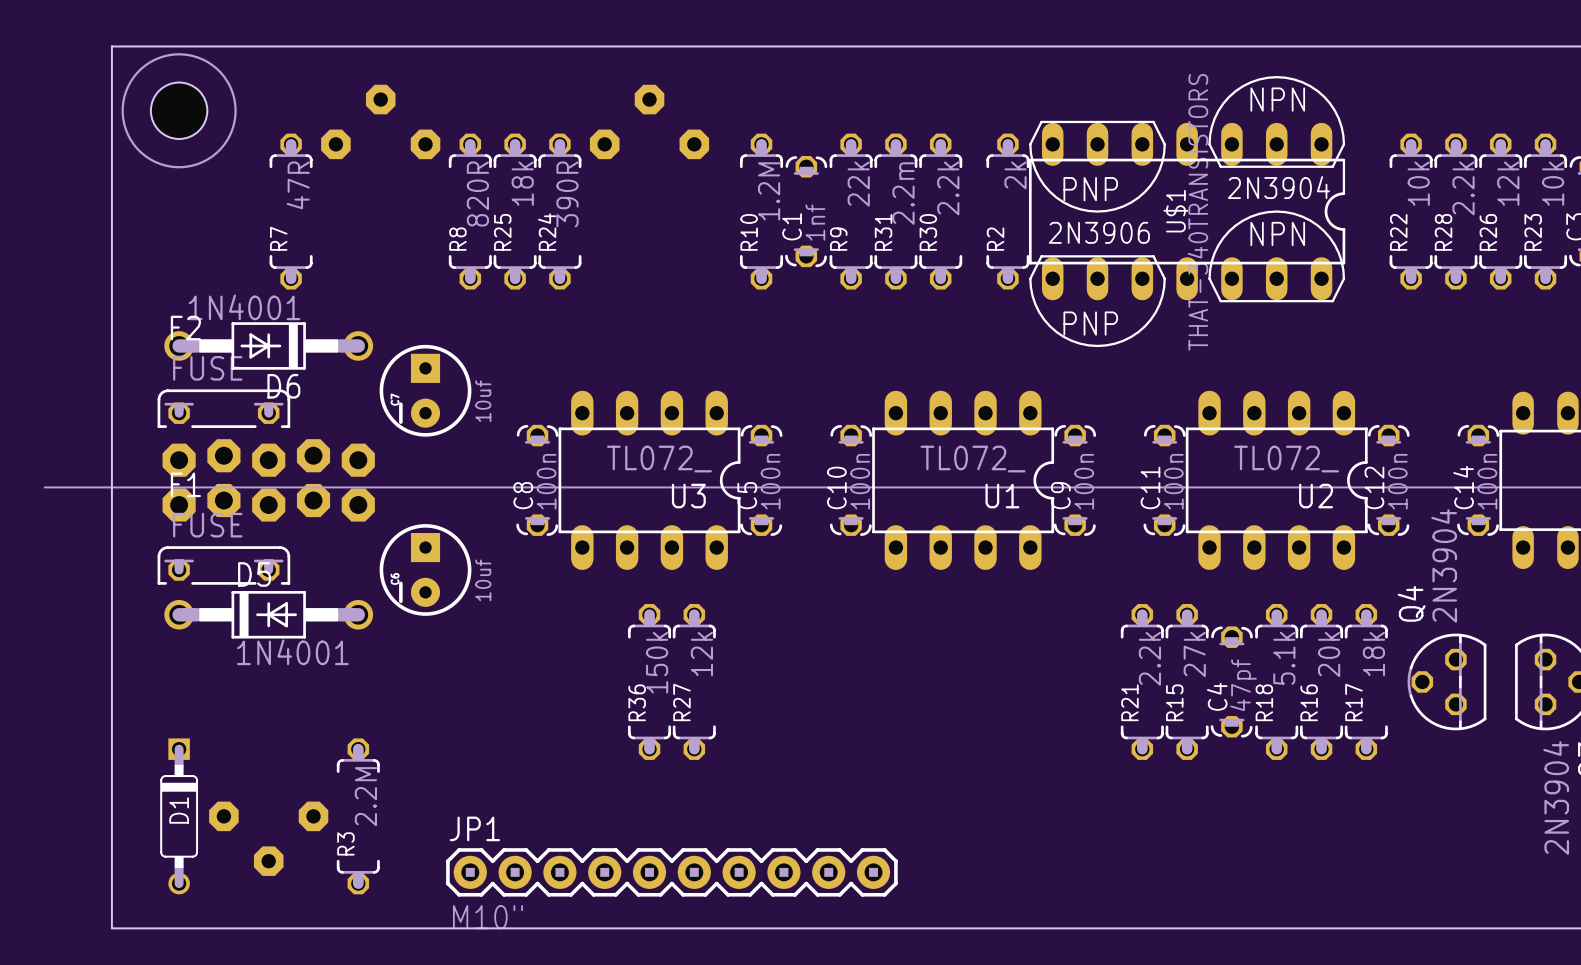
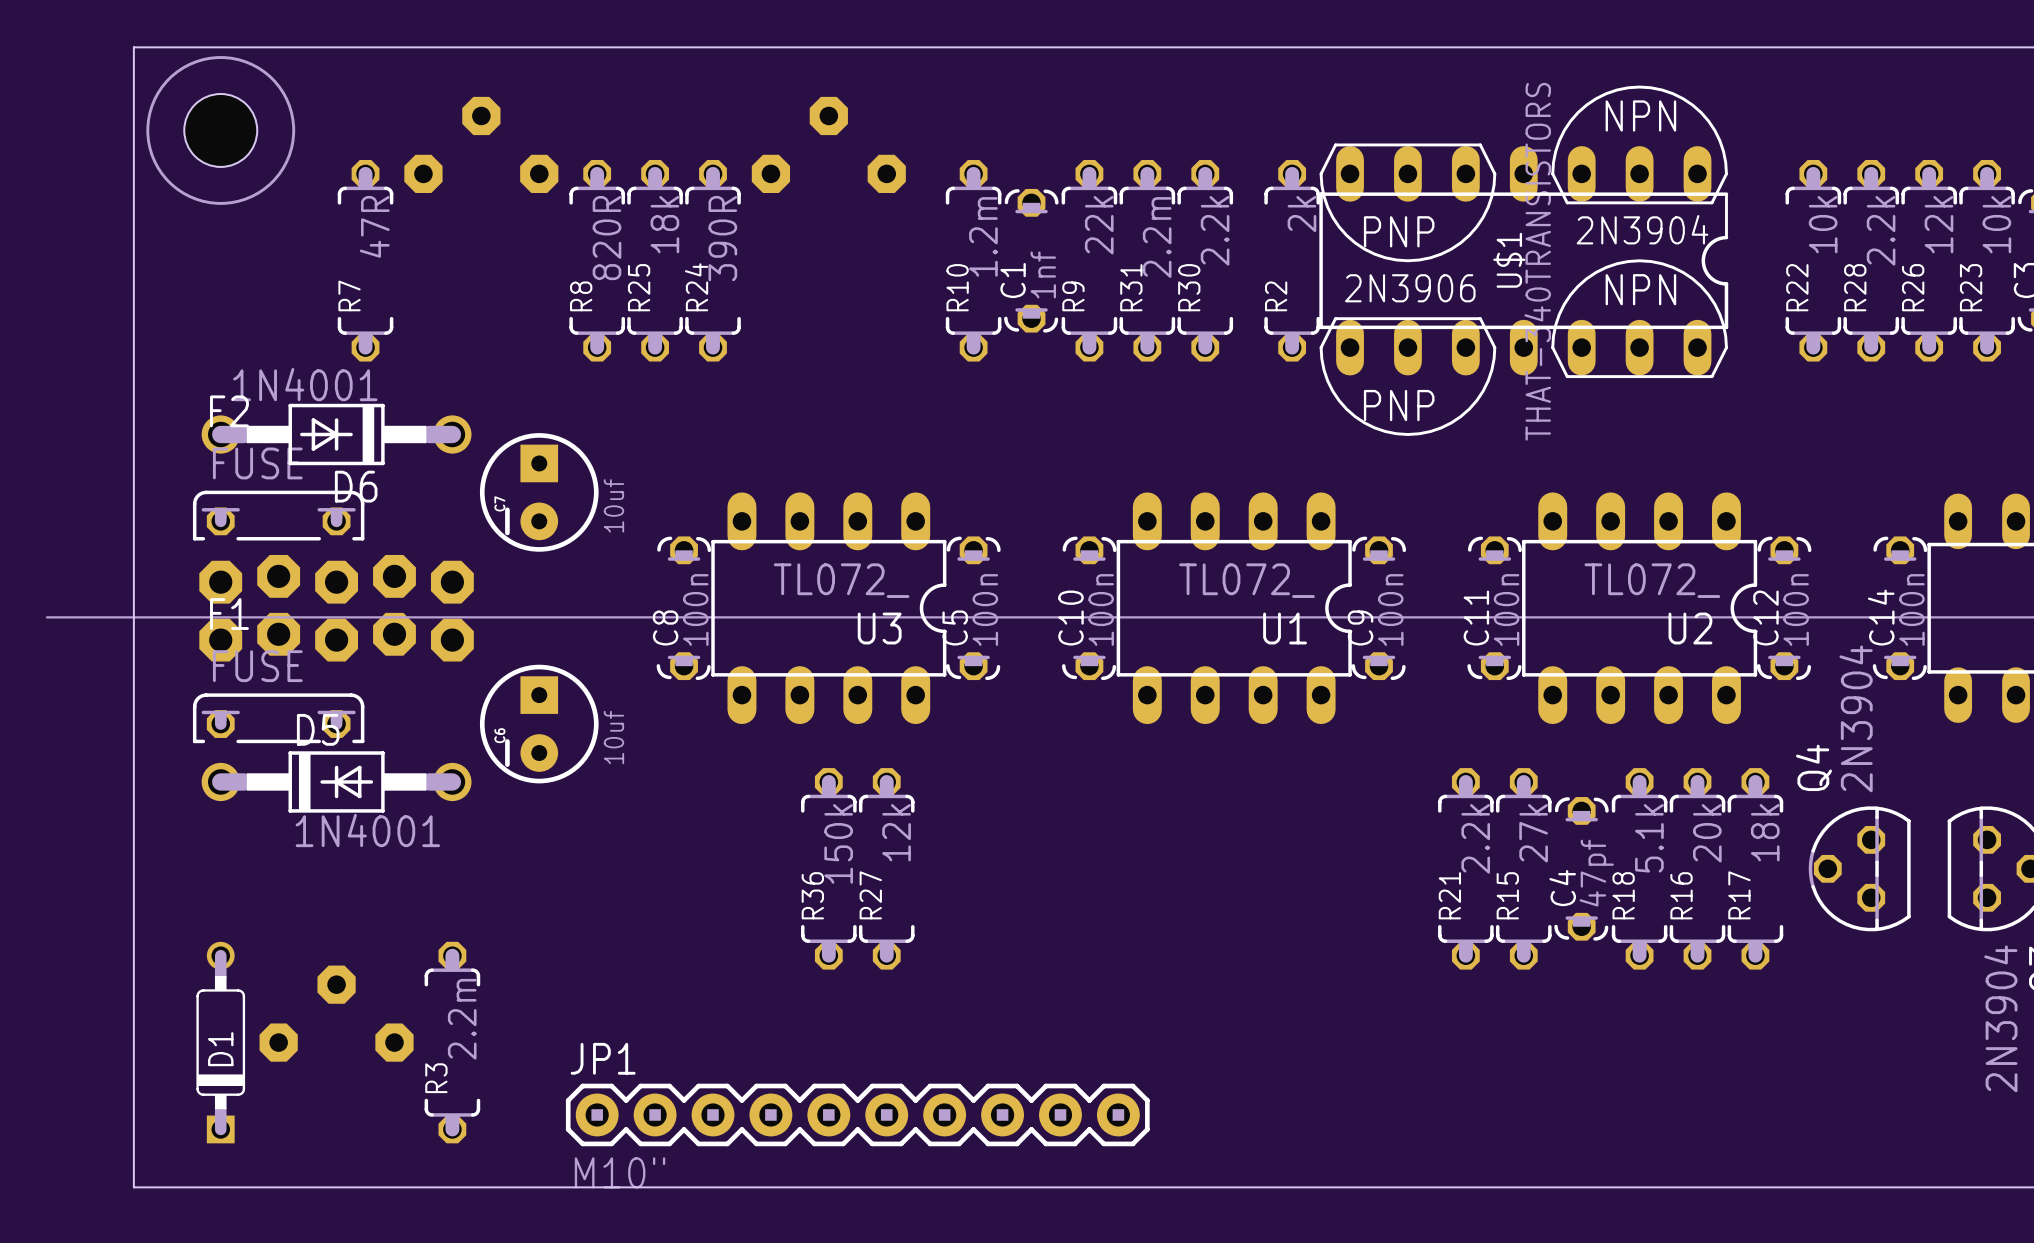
R10 value: 1.2M (769, 191) -> 1.2m (983, 236)
R3 value: 2.2M (365, 796) -> 2.2m (462, 1019)
D1 rotation: 0° (179, 816) -> 180° (220, 1042)
part rotation: 0° (268, 838) -> 180° (336, 1013)

